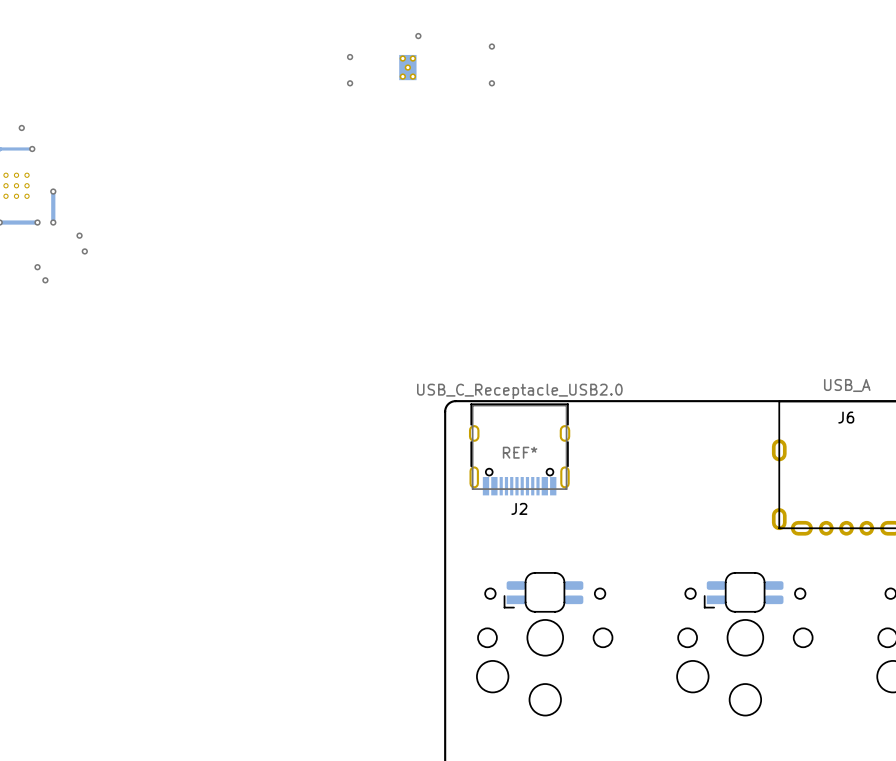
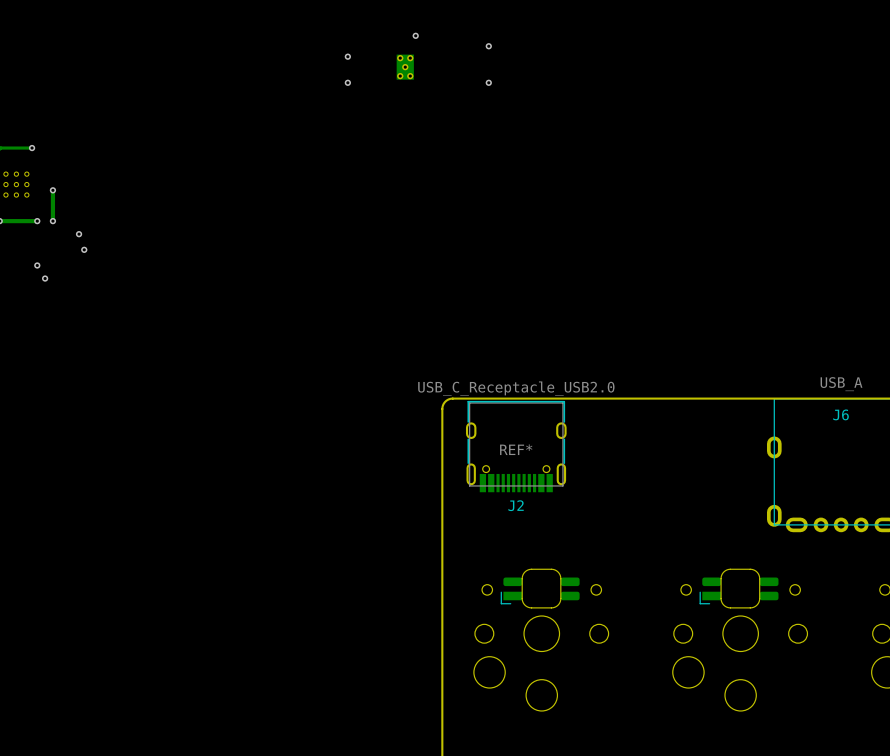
via: (21, 127) -> none

